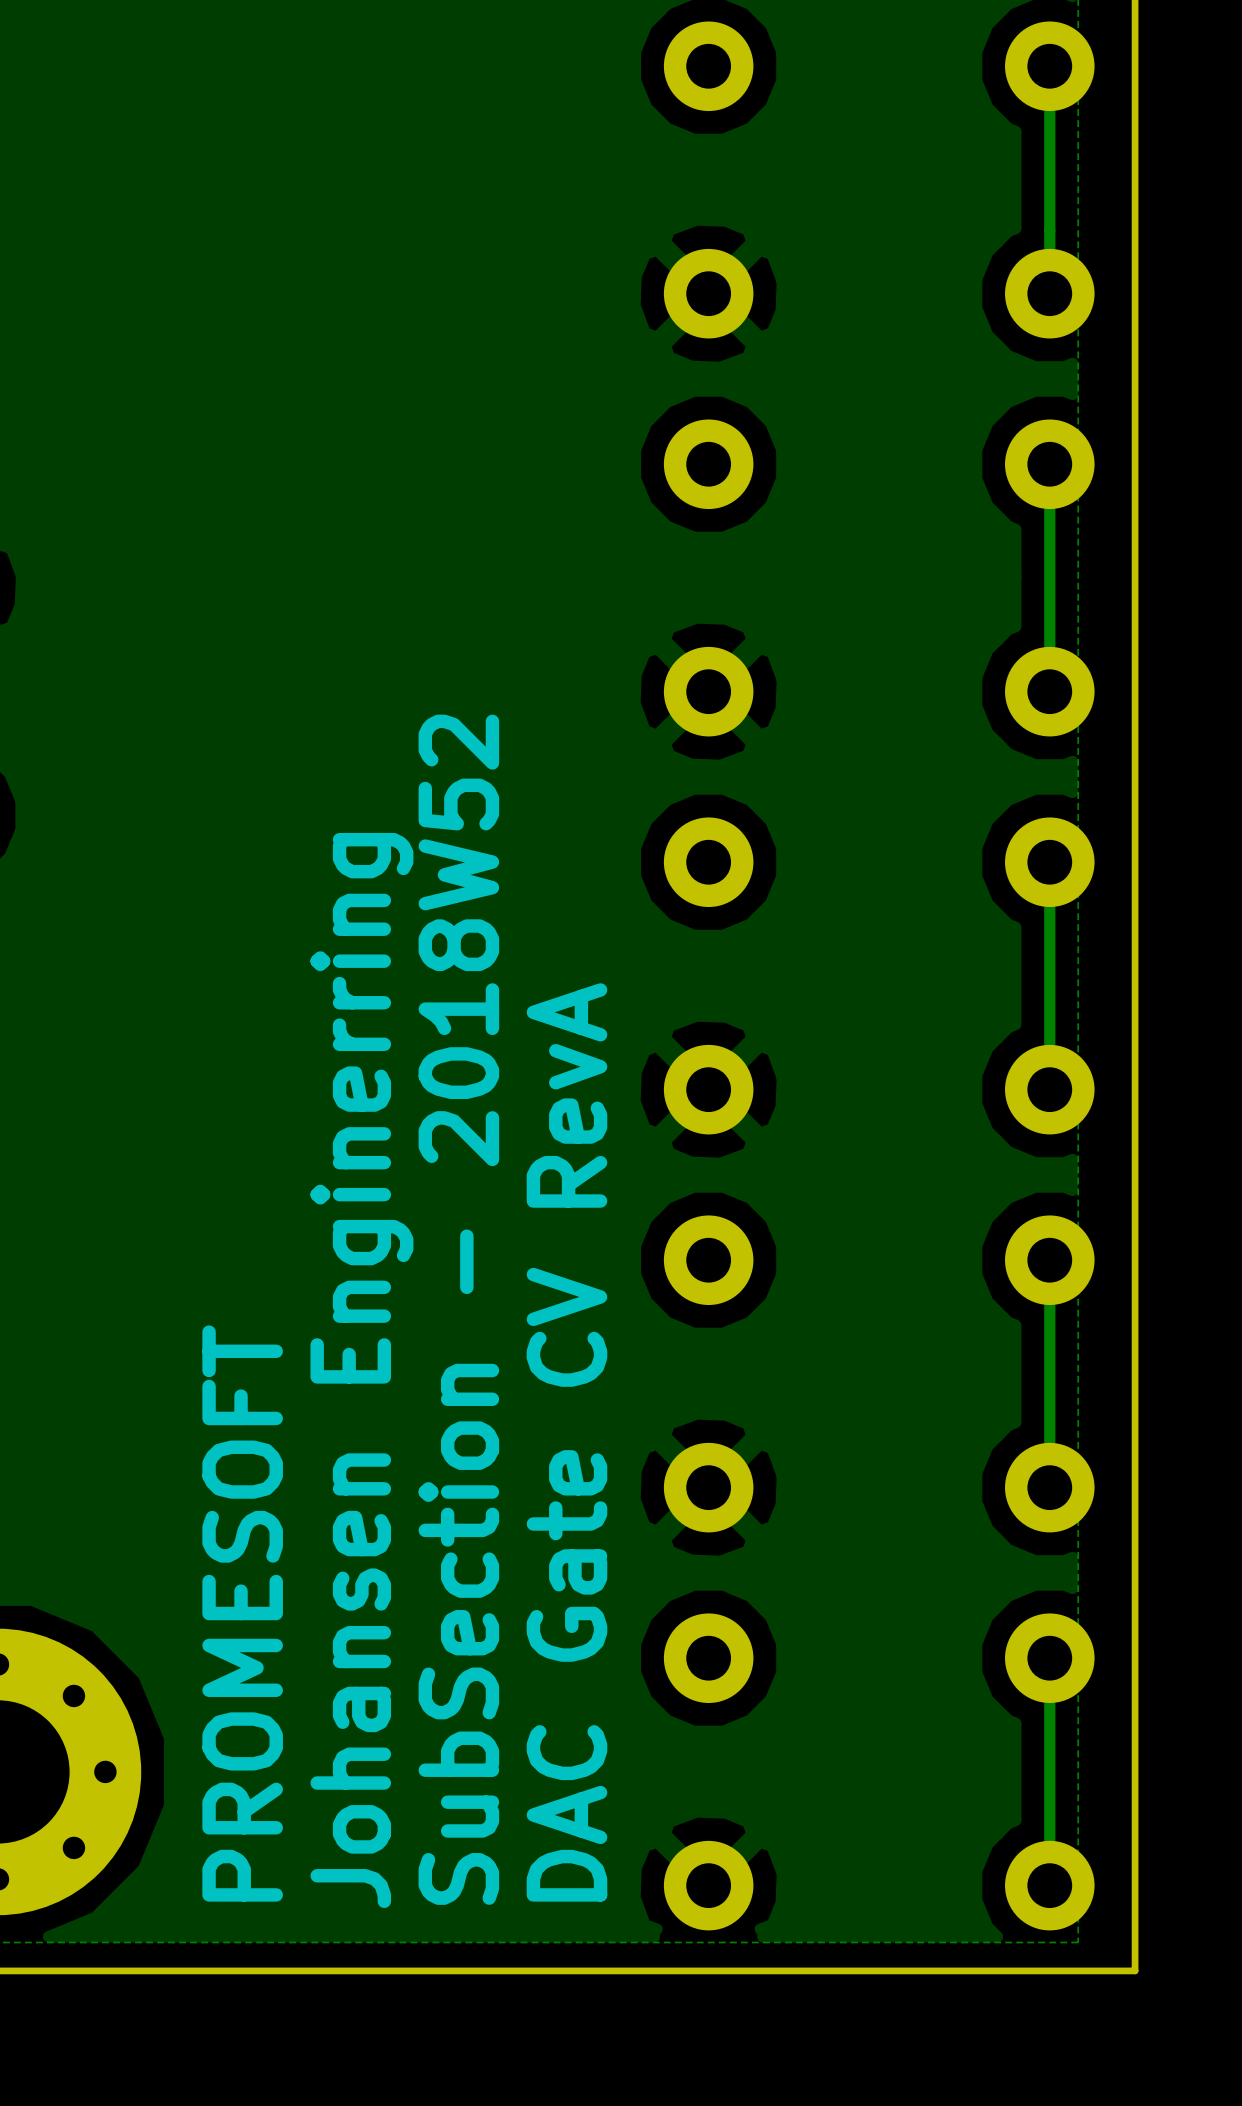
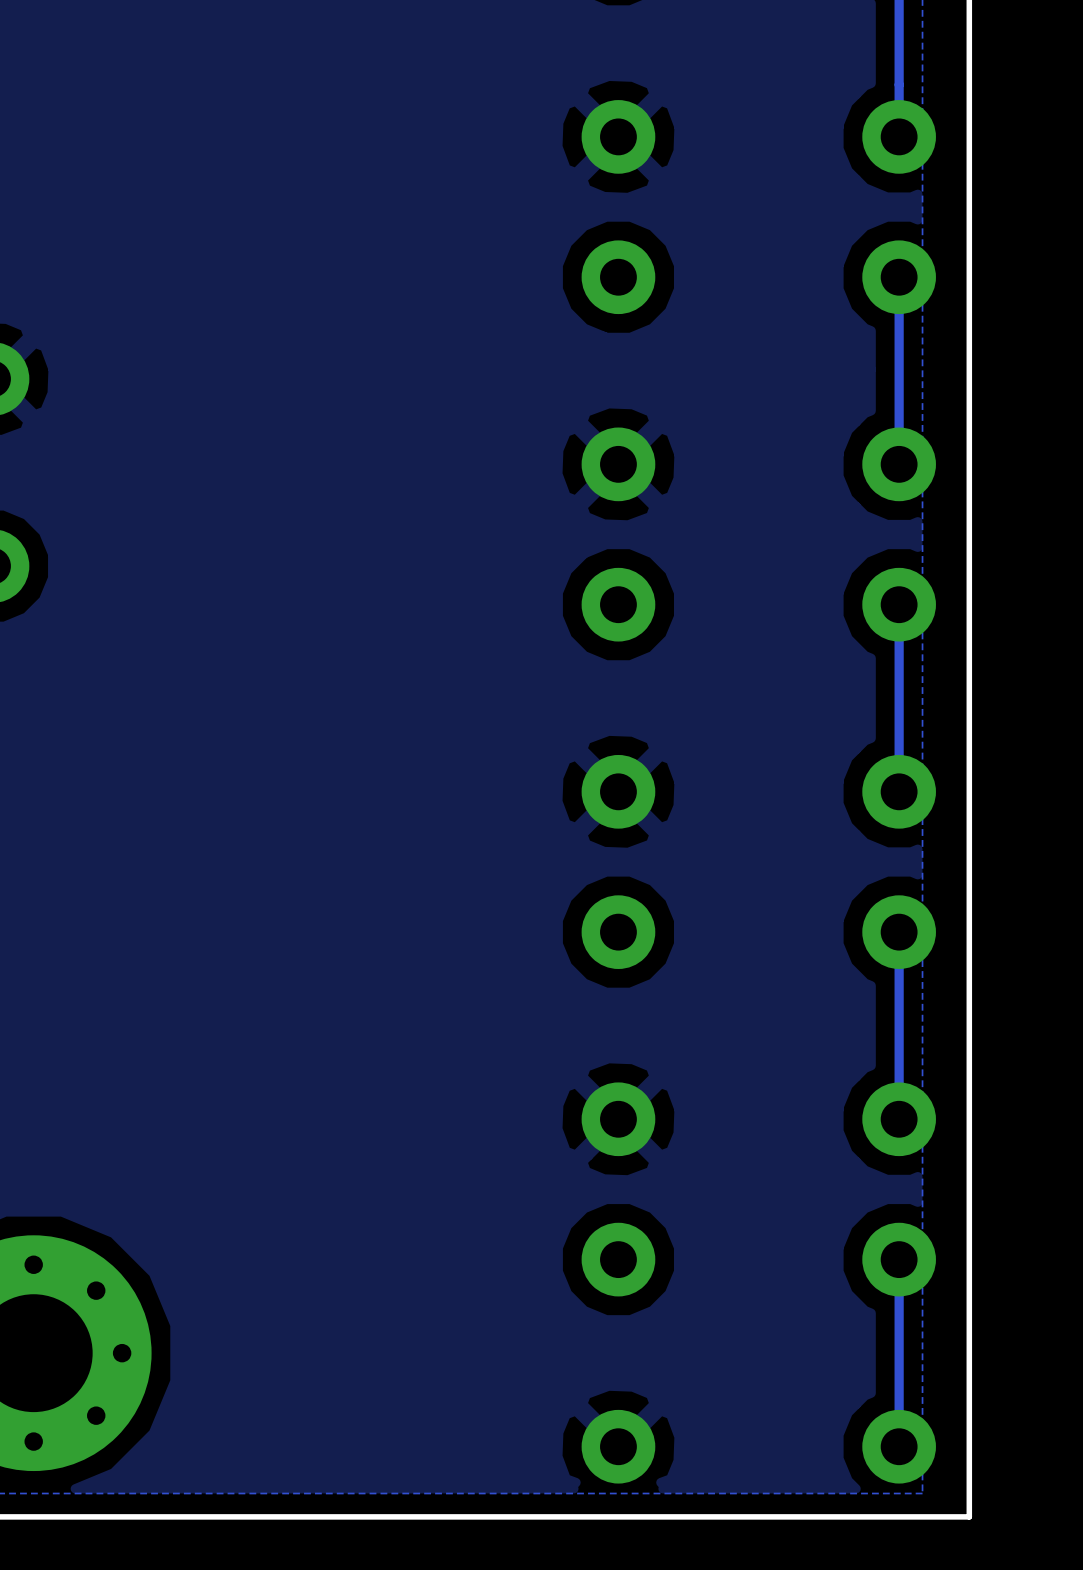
text: SubSection - 2018W52 (458, 1309) -> none
text: Johansen Enginerring (361, 1370) -> none
text: DAC Gate CV RevA (566, 1442) -> none
text: PROMESOFT (242, 1613) -> none

